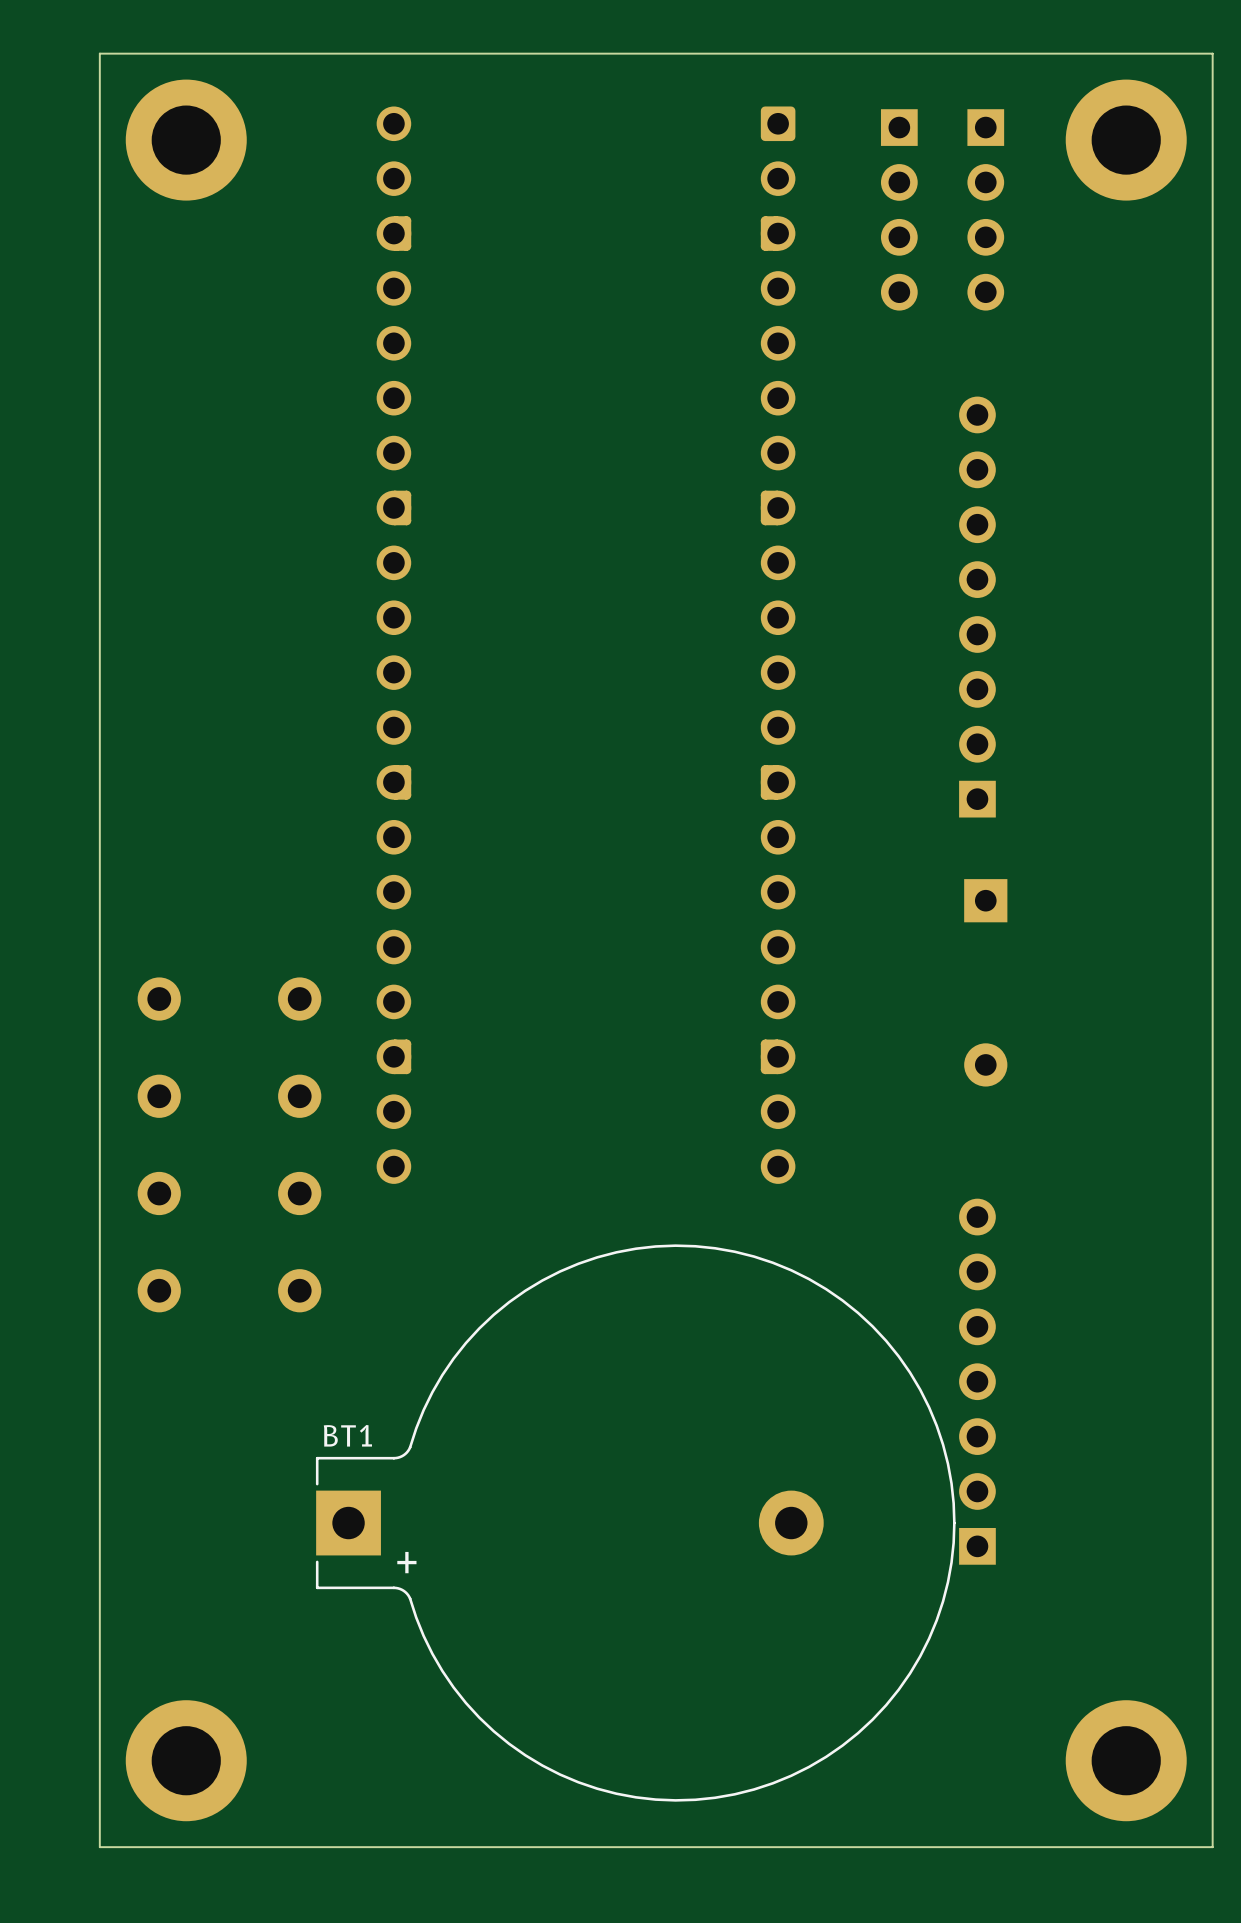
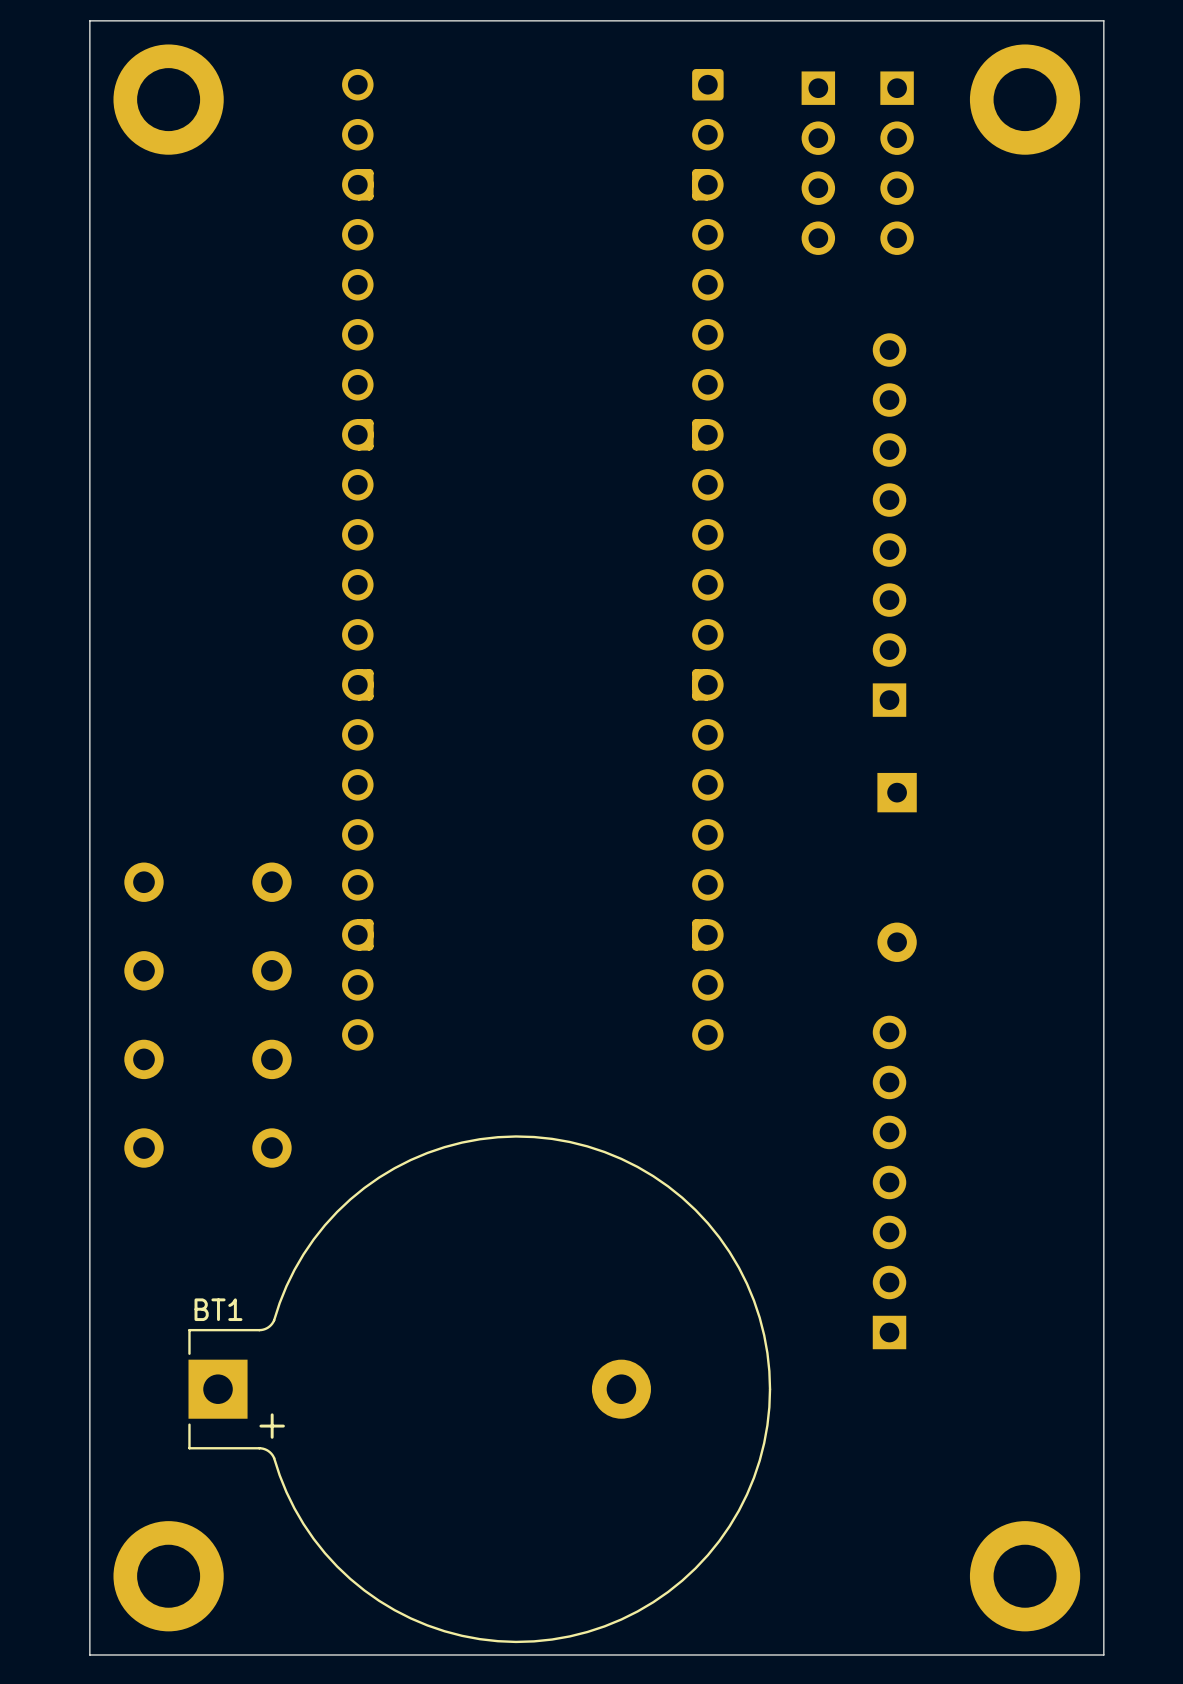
part position: (977, 1381) -> (889, 1182)
BT1 position: (635, 1523) -> (479, 1389)

